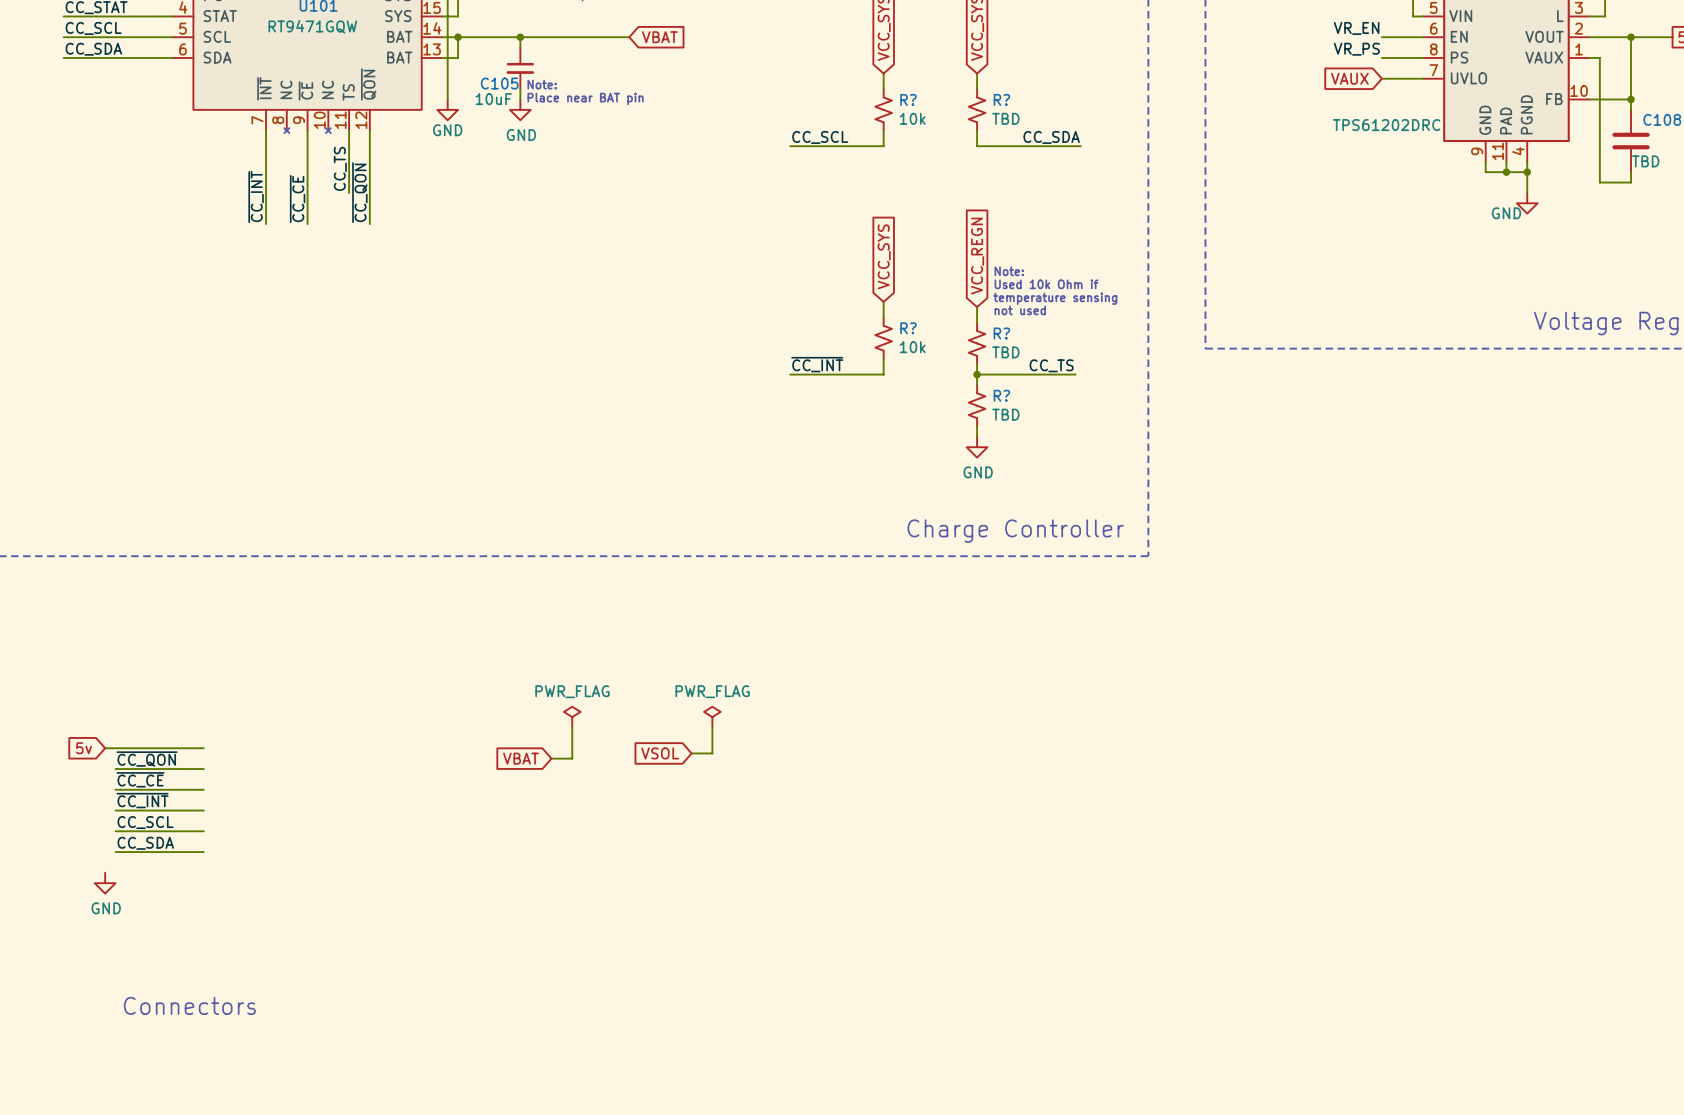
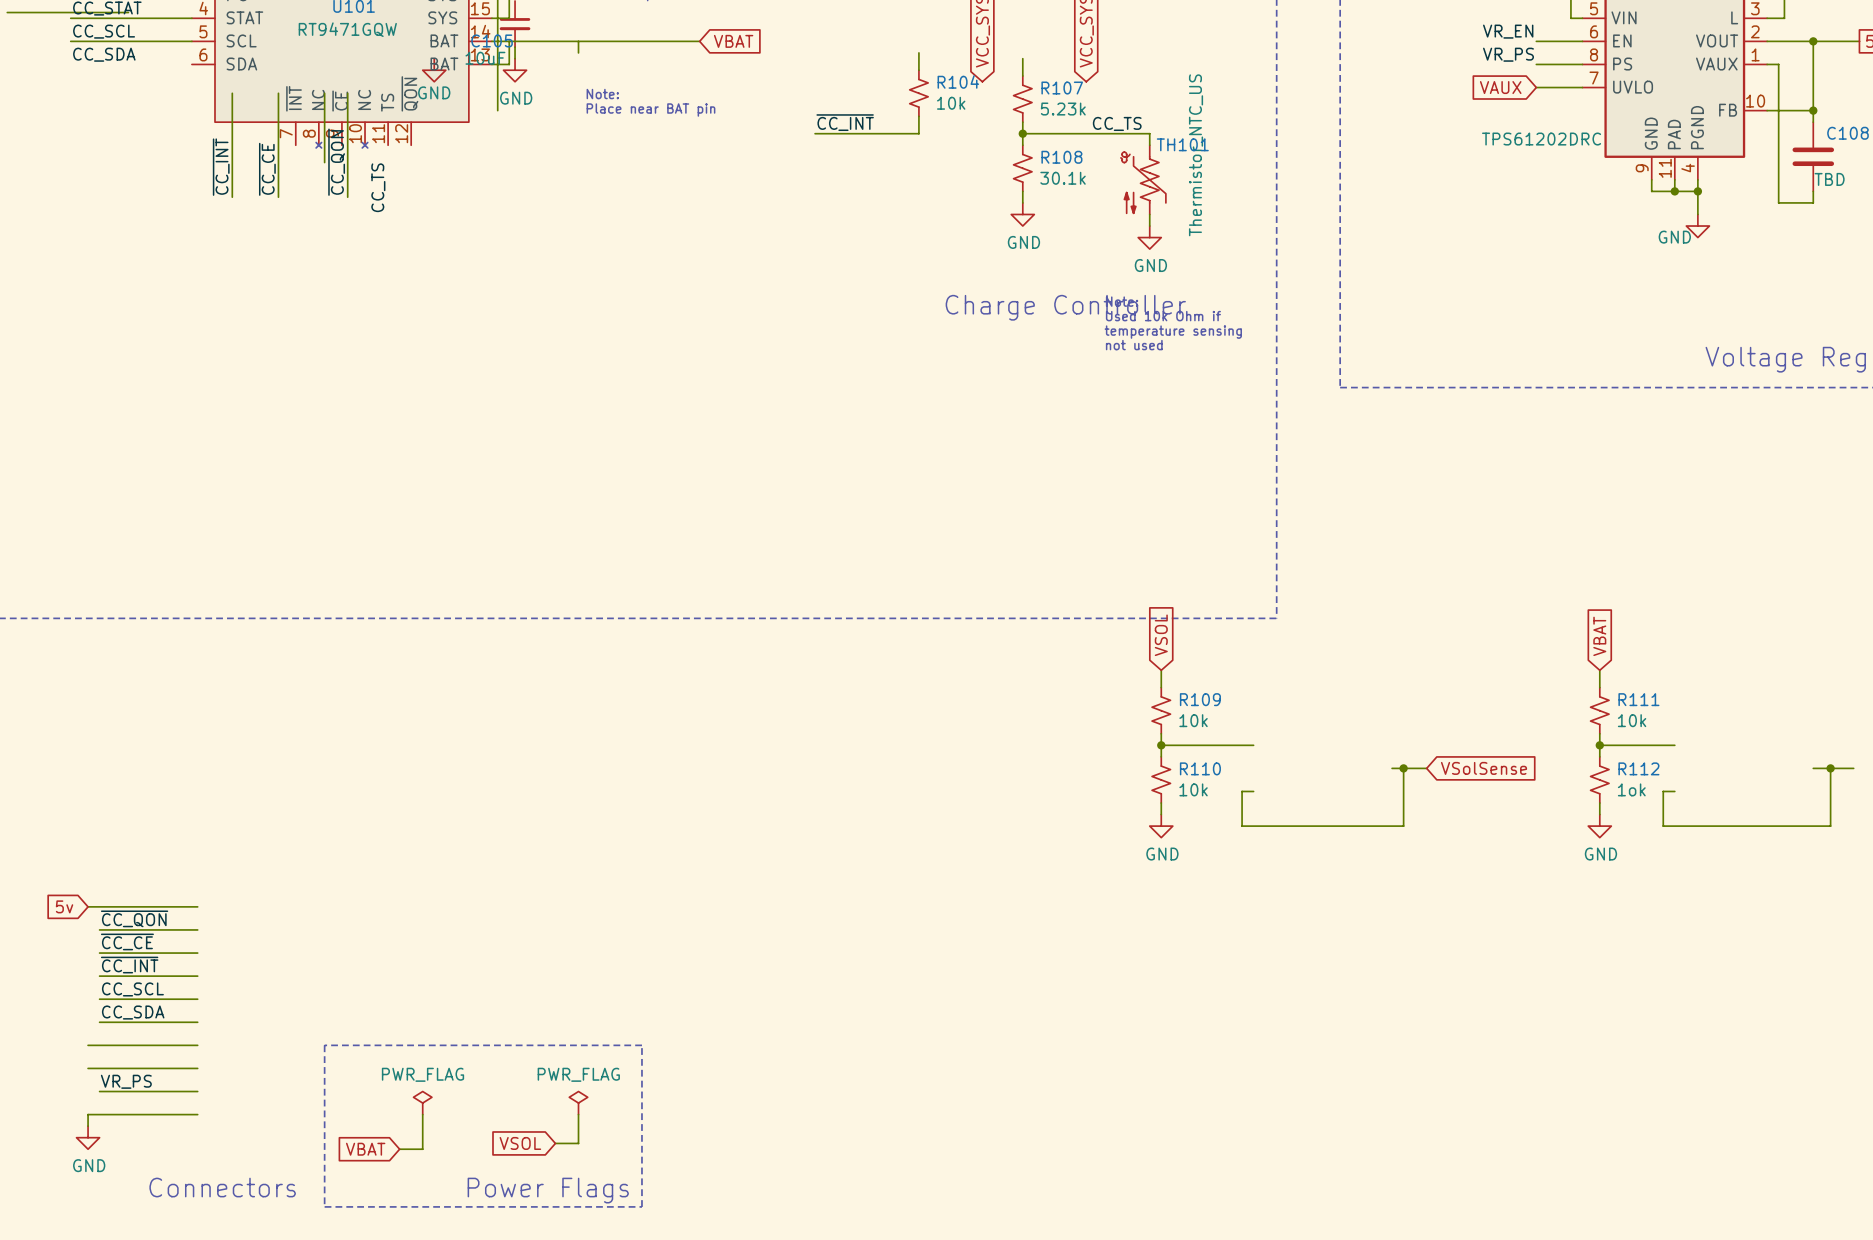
junction: (458, 37) -> none
junction: (520, 37) -> none
wire: (63, 57) (172, 57) -> (7, 12) (128, 12)
power symbol: none -> GND (434, 70)
power symbol: none -> GND (515, 70)
C105 position: (520, 68) -> (515, 24)
wire: (883, 73) (883, 89) -> (918, 52) (918, 70)
wire: (977, 73) (977, 89) -> (1022, 58) (1022, 76)
R104: none -> 10k (918, 93)
wire: (520, 89) (520, 99) -> (515, 47) (515, 58)
R107: none -> 5.23k (1022, 99)
power symbol: GND (447, 109) -> none
power symbol: GND (520, 109) -> none
R?: 10k (883, 109) -> none
wire: none -> (1022, 122) (1022, 145)
R?: TBD (977, 109) -> none
label: none -> ~{CC_INT} (845, 122)
label: none -> CC_TS (1117, 123)
wire: none -> (1022, 133) (1149, 133) (1149, 145)
junction: none -> (1022, 133)
wire: (266, 130) (266, 224) -> (232, 93) (232, 197)
wire: (307, 130) (307, 224) -> (278, 93) (278, 197)
wire: (349, 130) (349, 192) -> (324, 93) (324, 162)
wire: (369, 130) (369, 224) -> (347, 93) (347, 197)
wire: (883, 130) (883, 146) (790, 146) -> (918, 116) (918, 133) (815, 133)
wire: (977, 130) (977, 146) (1080, 146) -> none
label: CC_SCL (820, 137) -> none
label: CC_SDA (1051, 137) -> none
R108: none -> 30.1k (1022, 168)
TH101: none -> Thermistor_NTC_US (1143, 179)
wire: none -> (1022, 191) (1022, 202)
label position: ~{CC_QON} (359, 192) -> ~{CC_QON} (336, 162)
power symbol: none -> GND (1022, 214)
wire: none -> (1149, 214) (1149, 226)
label position: ~{CC_INT} (256, 197) -> ~{CC_INT} (221, 167)
label position: ~{CC_CE} (297, 199) -> ~{CC_CE} (267, 169)
power symbol: none -> GND (1149, 237)
global label: VCC_SYS (884, 256) -> none
global label: VCC_REGN (977, 256) -> none
text: none -> Charge Controller (1065, 307)
wire: (883, 301) (883, 317) -> none
wire: (977, 307) (977, 322) -> none
R?: 10k (883, 338) -> none
R?: TBD (977, 343) -> none
wire: (883, 359) (883, 374) (790, 374) -> none
label: ~{CC_INT} (817, 364) -> none
wire: (977, 364) (977, 384) -> none
label: CC_TS (1051, 365) -> none
wire: (977, 374) (1075, 374) -> none
junction: (977, 374) -> none
R?: TBD (977, 405) -> none
wire: (977, 426) (977, 436) -> none
power symbol: GND (977, 447) -> none
text: Charge Controller (1015, 531) -> none
global label: none -> VSOL (1161, 635)
global label: none -> VBAT (1599, 636)
wire: none -> (1161, 670) (1161, 687)
wire: none -> (1599, 670) (1599, 687)
R109: none -> 10k (1161, 710)
R111: none -> 10k (1599, 710)
wire: none -> (1161, 733) (1161, 756)
wire: none -> (1599, 733) (1599, 756)
wire: none -> (1161, 745) (1253, 745)
junction: none -> (1161, 745)
wire: none -> (1599, 745) (1674, 745)
junction: none -> (1599, 745)
wire: none -> (1392, 768) (1426, 768)
wire: none -> (1403, 768) (1403, 826) (1242, 826) (1242, 791) (1253, 791)
junction: none -> (1403, 768)
global label: none -> VSolSense (1484, 768)
wire: none -> (1813, 768) (1853, 768)
wire: none -> (1830, 768) (1830, 826) (1663, 826) (1663, 791) (1674, 791)
junction: none -> (1830, 768)
R110: none -> 10k (1161, 779)
R112: none -> 1ok (1599, 779)
power symbol: PWR_FLAG (572, 717) -> none
power symbol: PWR_FLAG (712, 717) -> none
wire: none -> (1161, 803) (1161, 814)
wire: none -> (1599, 803) (1599, 814)
wire: (572, 727) (572, 758) (551, 758) -> none
wire: (712, 727) (712, 753) (691, 753) -> none
power symbol: none -> GND (1161, 826)
power symbol: none -> GND (1599, 826)
global label position: 5v (84, 748) -> 5v (64, 906)
wire: (105, 748) (203, 748) -> (88, 906) (197, 906)
global label: VSOL (660, 753) -> none
global label: VBAT (520, 758) -> none
label position: ~{CC_QON} (147, 759) -> ~{CC_QON} (134, 918)
wire: (115, 769) (203, 769) -> (99, 929) (197, 929)
label position: ~{CC_CE} (140, 779) -> ~{CC_CE} (127, 941)
wire: (115, 789) (203, 789) -> (99, 953) (197, 953)
label position: ~{CC_INT} (142, 800) -> ~{CC_INT} (129, 965)
wire: (115, 810) (203, 810) -> (99, 976) (197, 976)
label position: CC_SCL (145, 822) -> CC_SCL (132, 989)
wire: (115, 831) (203, 831) -> (99, 999) (197, 999)
label position: CC_SDA (145, 843) -> CC_SDA (133, 1012)
wire: (115, 852) (203, 852) -> (99, 1022) (197, 1022)
power symbol: GND (105, 883) -> none
wire: none -> (88, 1045) (197, 1045)
line: none -> (324, 1045) (324, 1206) (641, 1206) (641, 1045) (324, 1045)
wire: none -> (88, 1068) (197, 1068)
label: none -> VR_PS (126, 1081)
wire: none -> (99, 1091) (197, 1091)
power symbol: none -> PWR_FLAG (422, 1103)
power symbol: none -> PWR_FLAG (578, 1103)
wire: none -> (197, 1114) (88, 1114) (88, 1126)
wire: none -> (422, 1114) (422, 1149) (399, 1149)
wire: none -> (578, 1114) (578, 1143) (555, 1143)
text position: Connectors (189, 1005) -> Connectors (222, 1187)
power symbol: none -> GND (88, 1137)
global label: none -> VSOL (520, 1143)
global label: none -> VBAT (365, 1149)
text: none -> Power Flags (548, 1190)

